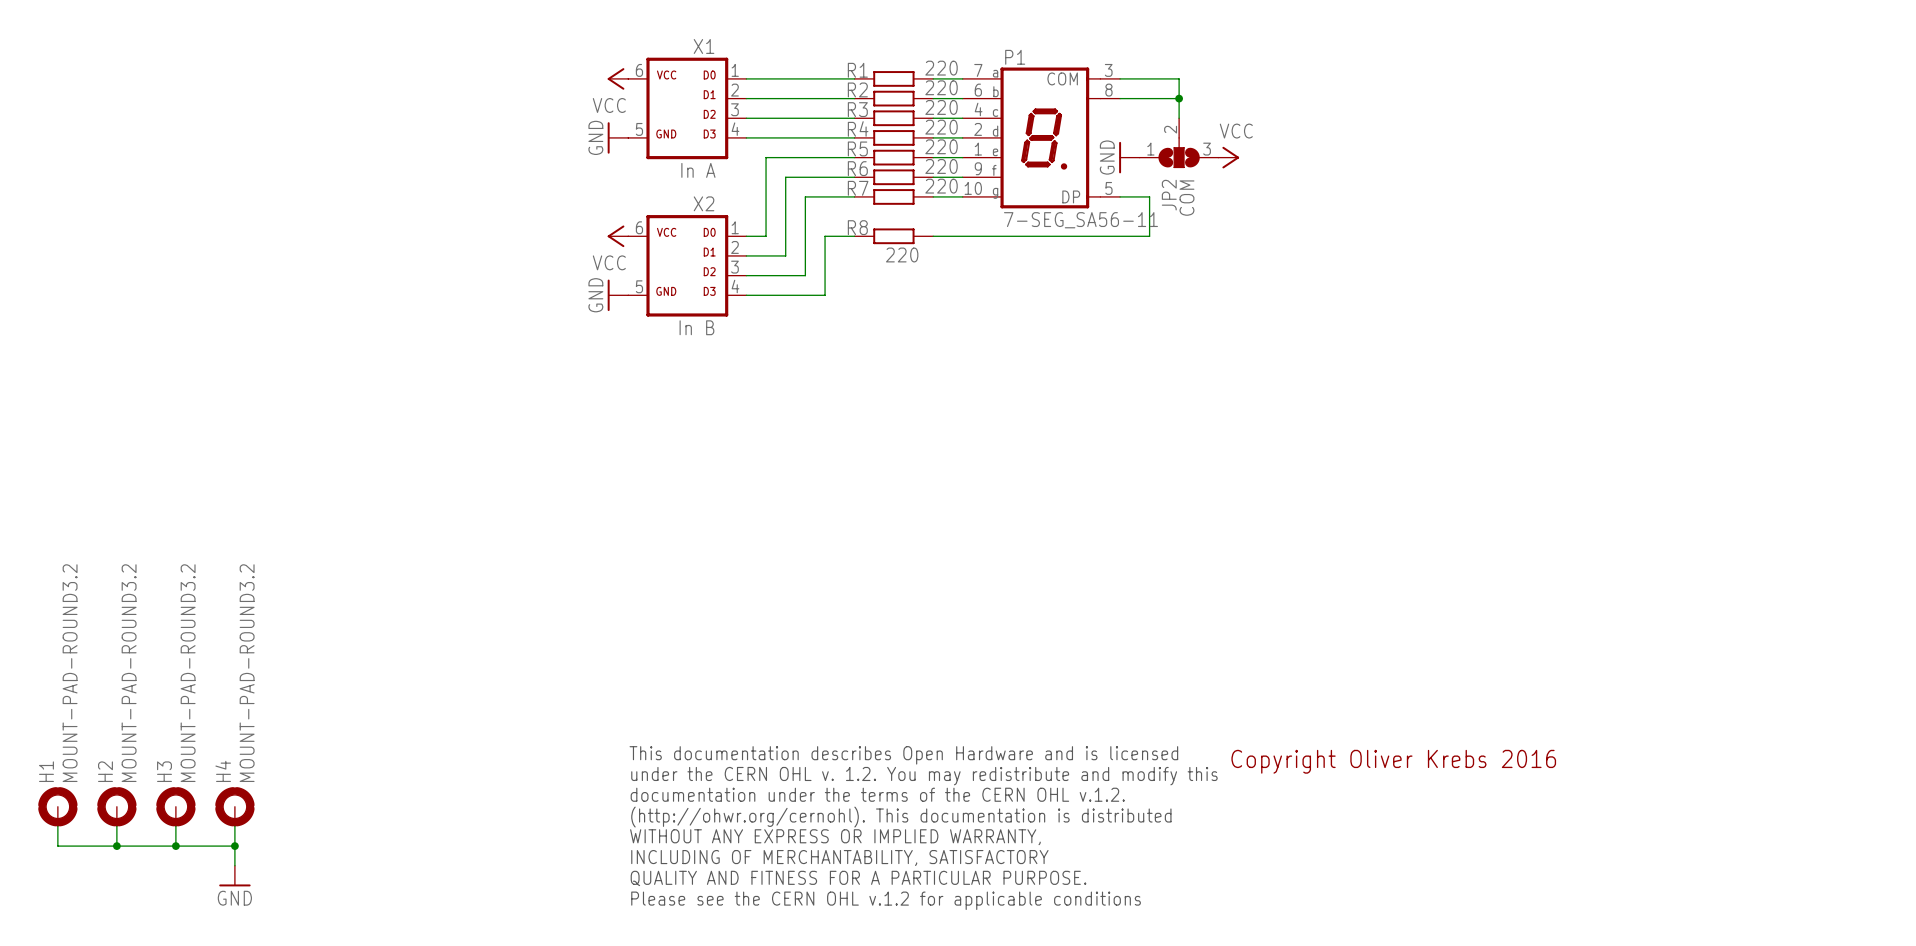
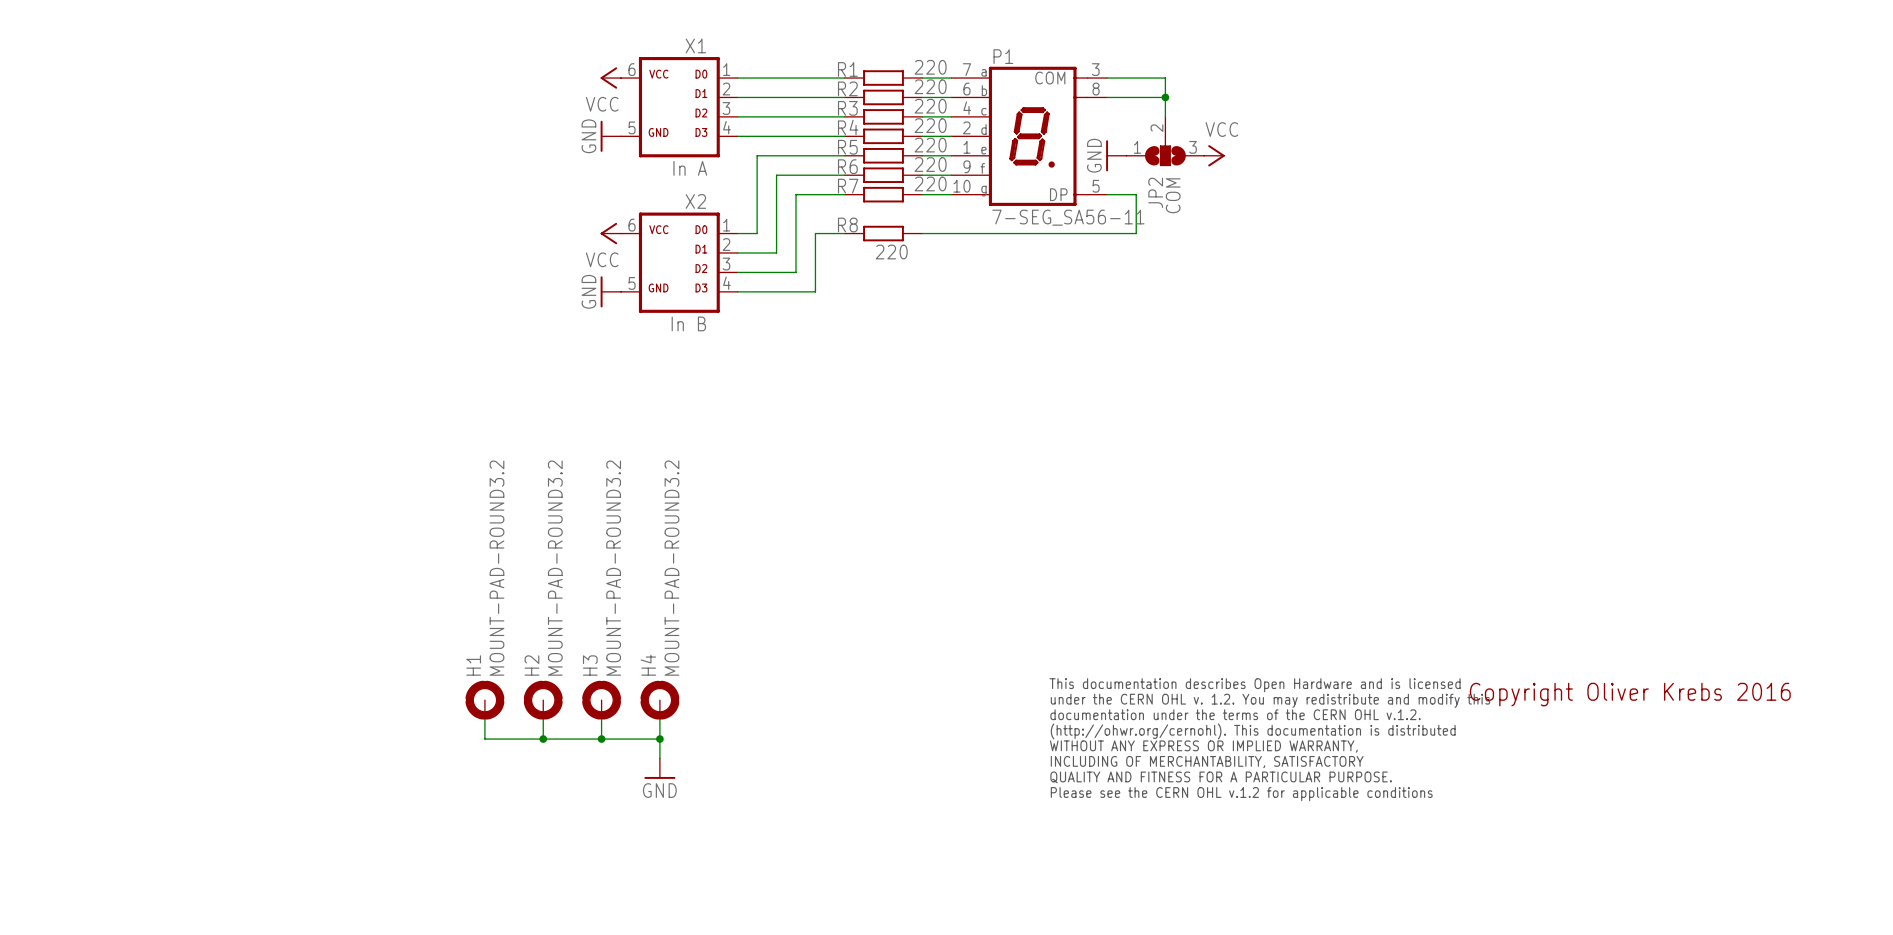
text: none -> This documentation describes Open Hardware and is licensed (1255, 685)
text: none -> Copyright Oliver Krebs 2016 (1630, 694)
text: none -> under the CERN OHL v. 1.2. You may redistribute and modify this (1270, 700)
text: none -> documentation under the terms of the CERN OHL v.1.2. (1235, 714)
wire: none -> (484, 719) (484, 739) (659, 739)
wire: none -> (543, 719) (543, 739)
wire: none -> (601, 719) (601, 739)
wire: none -> (659, 719) (659, 758)
text: none -> (http://ohwr.org/cernohl). This documentation is distributed (1253, 731)
junction: none -> (543, 739)
junction: none -> (601, 739)
junction: none -> (659, 739)
text: This documentation describes Open Hardware and is licensed (903, 755) -> none
text: none -> WITHOUT ANY EXPRESS OR IMPLIED WARRANTY, (1203, 746)
text: Copyright Oliver Krebs 2016 (1393, 761) -> none
text: none -> INCLUDING OF MERCHANTABILITY, SATISFACTORY (1207, 762)
text: under the CERN OHL v. 1.2. You may redistribute and modify this (924, 776) -> none
power symbol: none -> GND (659, 768)
text: none -> QUALITY AND FITNESS FOR A PARTICULAR PURPOSE. (1221, 777)
text: documentation under the terms of the CERN OHL v.1.2. (877, 794) -> none
text: none -> Please see the CERN OHL v.1.2 for applicable conditions (1241, 794)
H1 position: (57, 806) -> (484, 700)
H2 position: (116, 806) -> (543, 700)
H3 position: (175, 806) -> (601, 700)
H4 position: (234, 806) -> (659, 700)
text: (http://ohwr.org/cernohl). This documentation is distributed (901, 817) -> none
wire: (57, 826) (57, 846) (234, 846) -> none
wire: (116, 826) (116, 846) -> none
wire: (175, 826) (175, 846) -> none
wire: (234, 826) (234, 865) -> none
text: WITHOUT ANY EXPRESS OR IMPLIED WARRANTY, (835, 837) -> none
junction: (116, 846) -> none
junction: (175, 846) -> none
junction: (234, 846) -> none
text: INCLUDING OF MERCHANTABILITY, SATISFACTORY (839, 857) -> none
power symbol: GND (234, 876) -> none
text: QUALITY AND FITNESS FOR A PARTICULAR PURPOSE. (858, 878) -> none
text: Please see the CERN OHL v.1.2 for applicable conditions (886, 900) -> none

